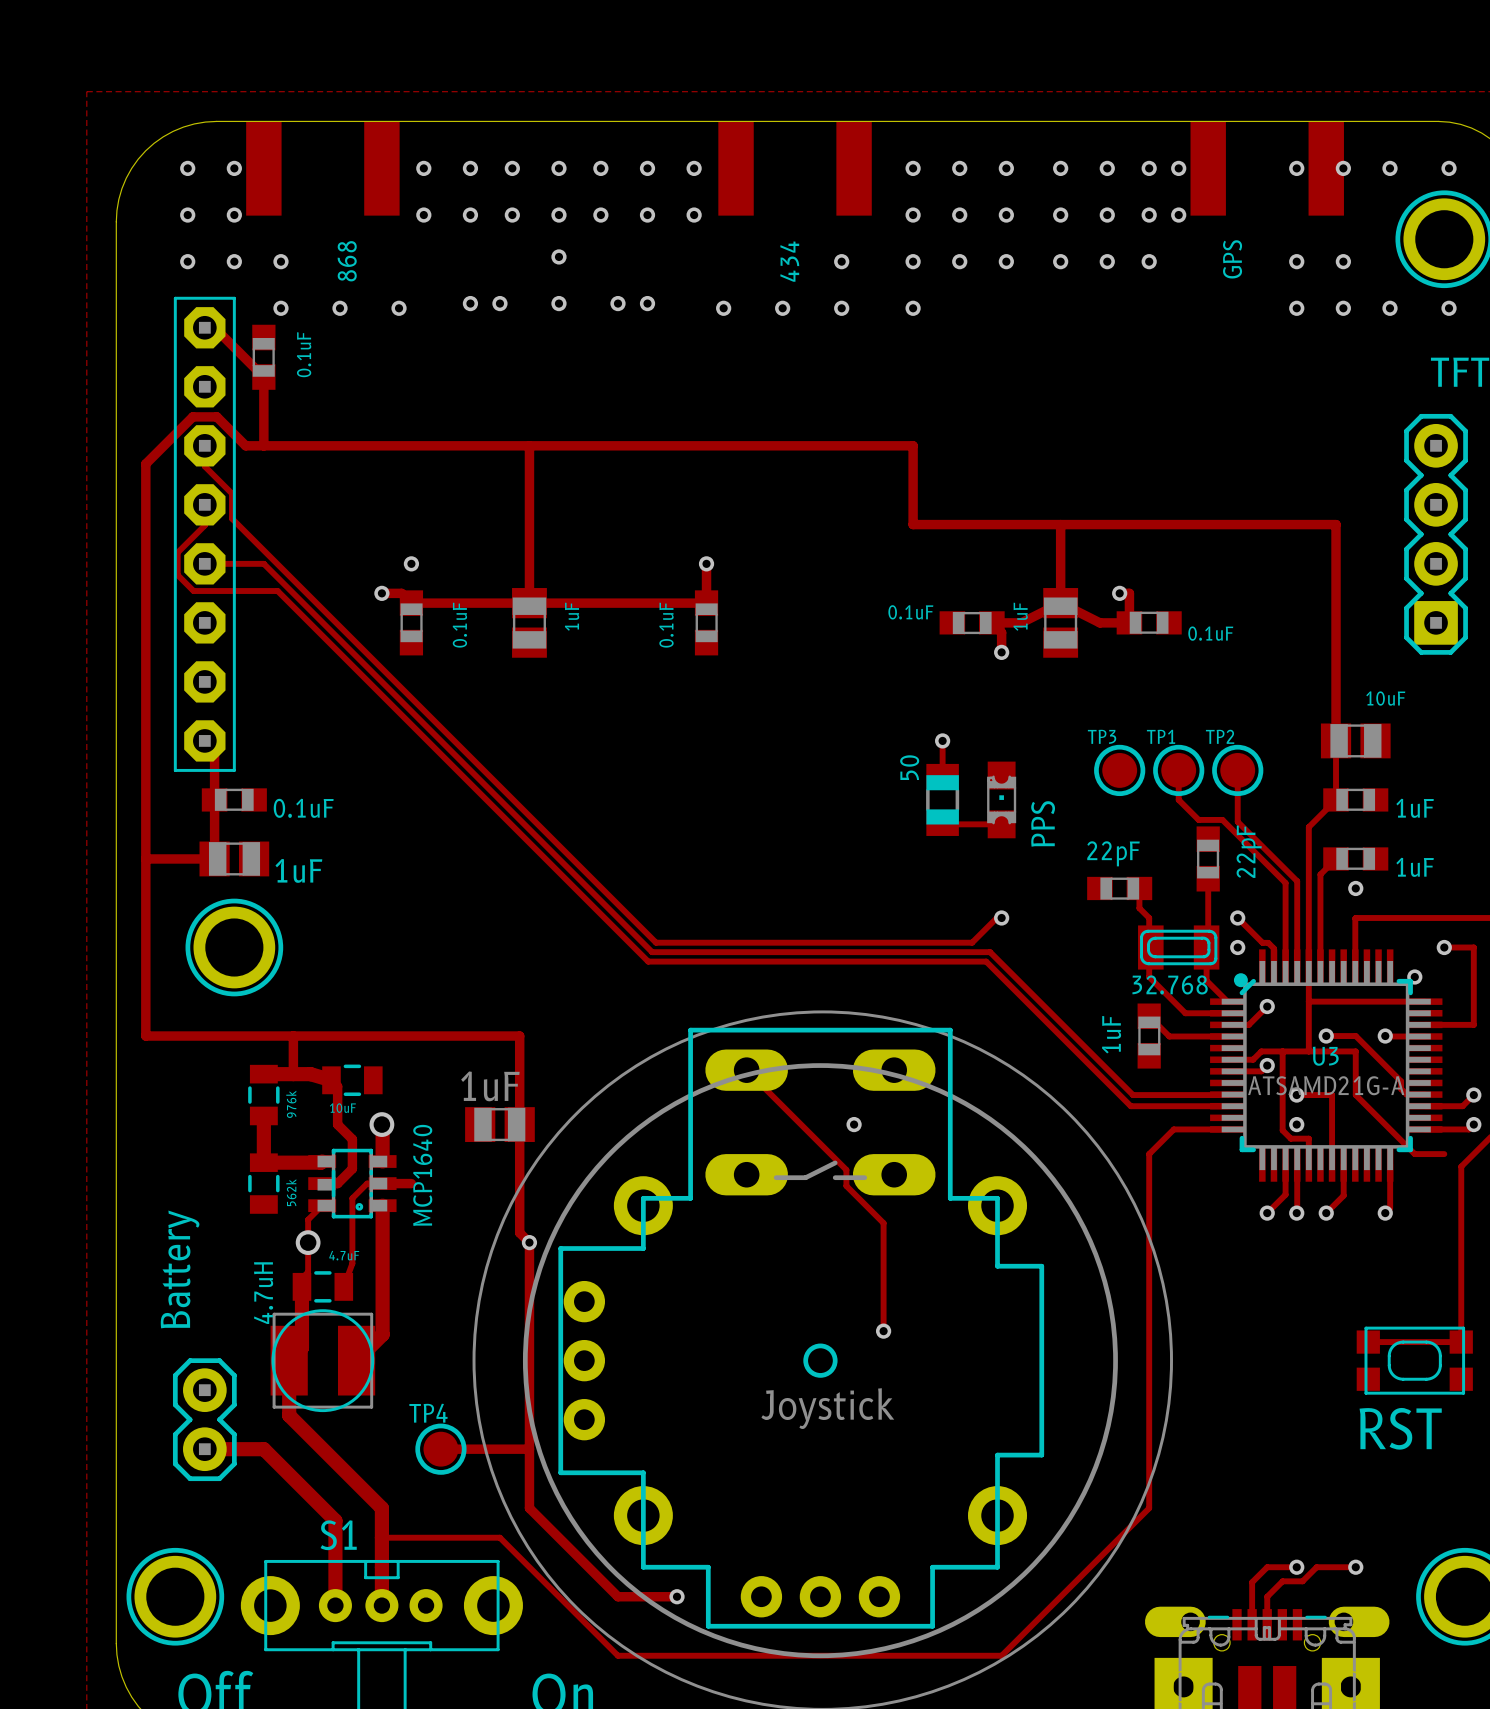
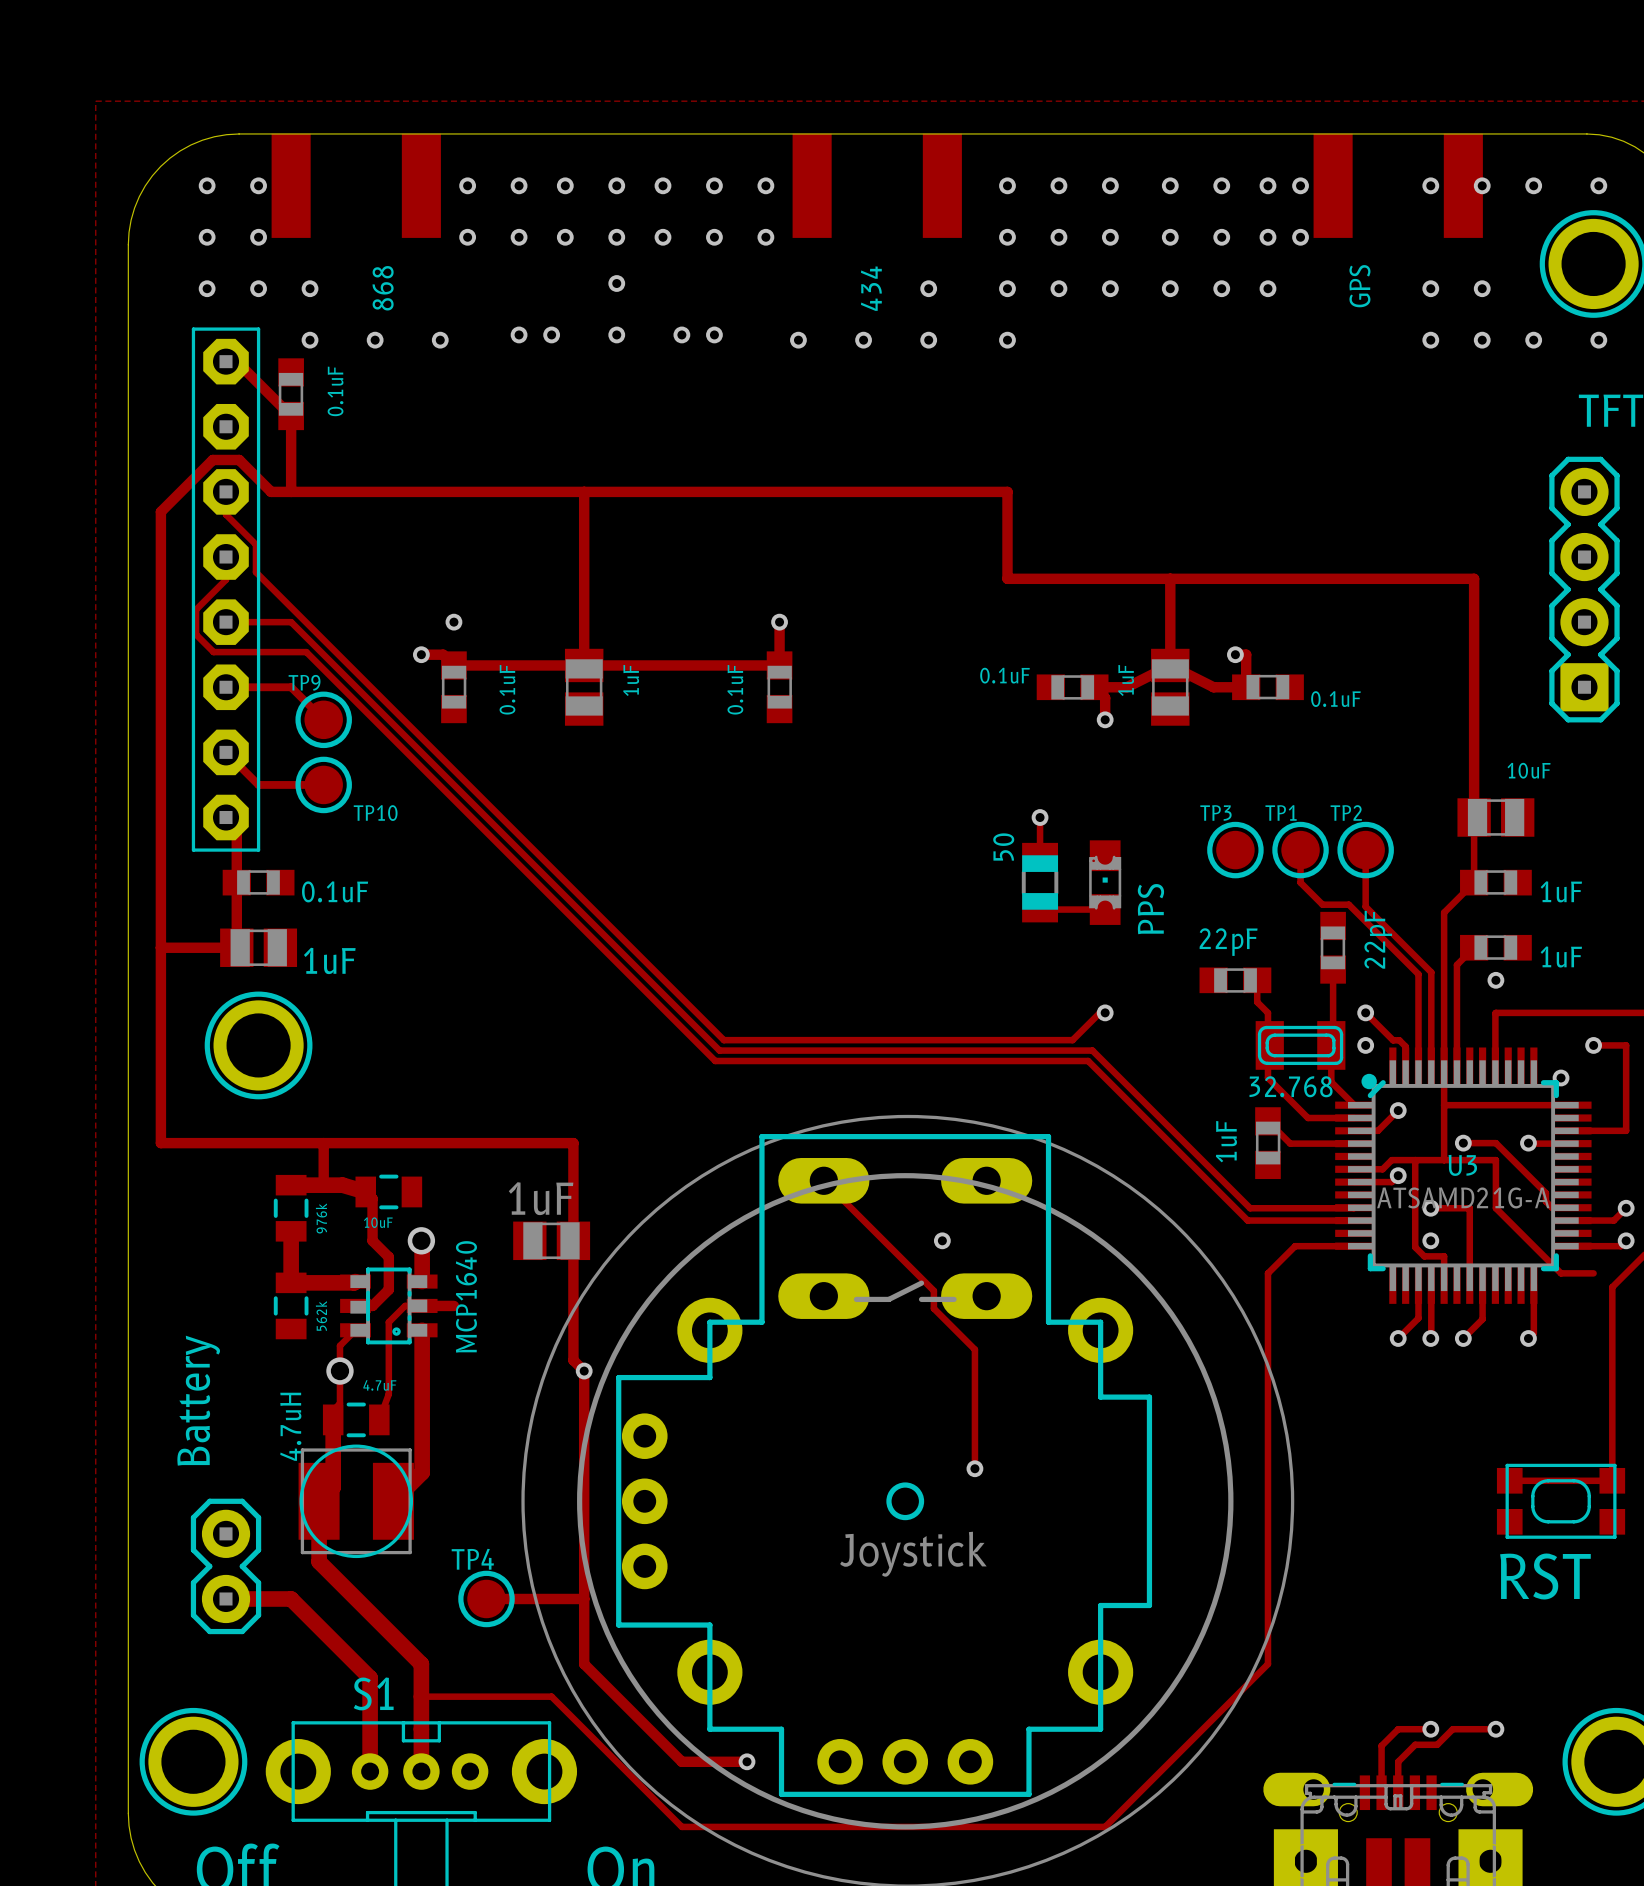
track: none -> (226, 687) (291, 687) (323, 719)
TP9: none -> (323, 719)
track: none -> (226, 752) (258, 784) (323, 784)
TP10: none -> (323, 784)

